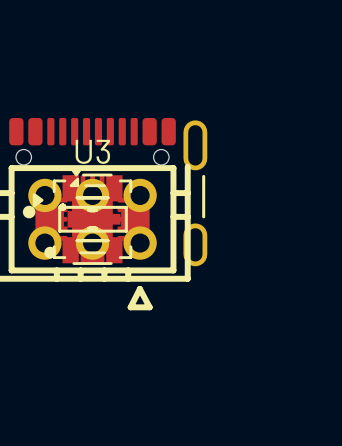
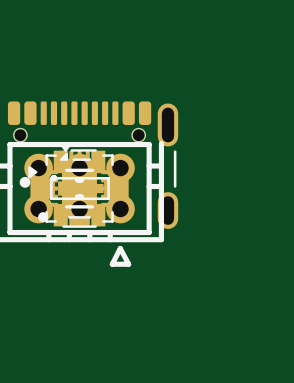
U3 name: U3 (92, 151) -> none

